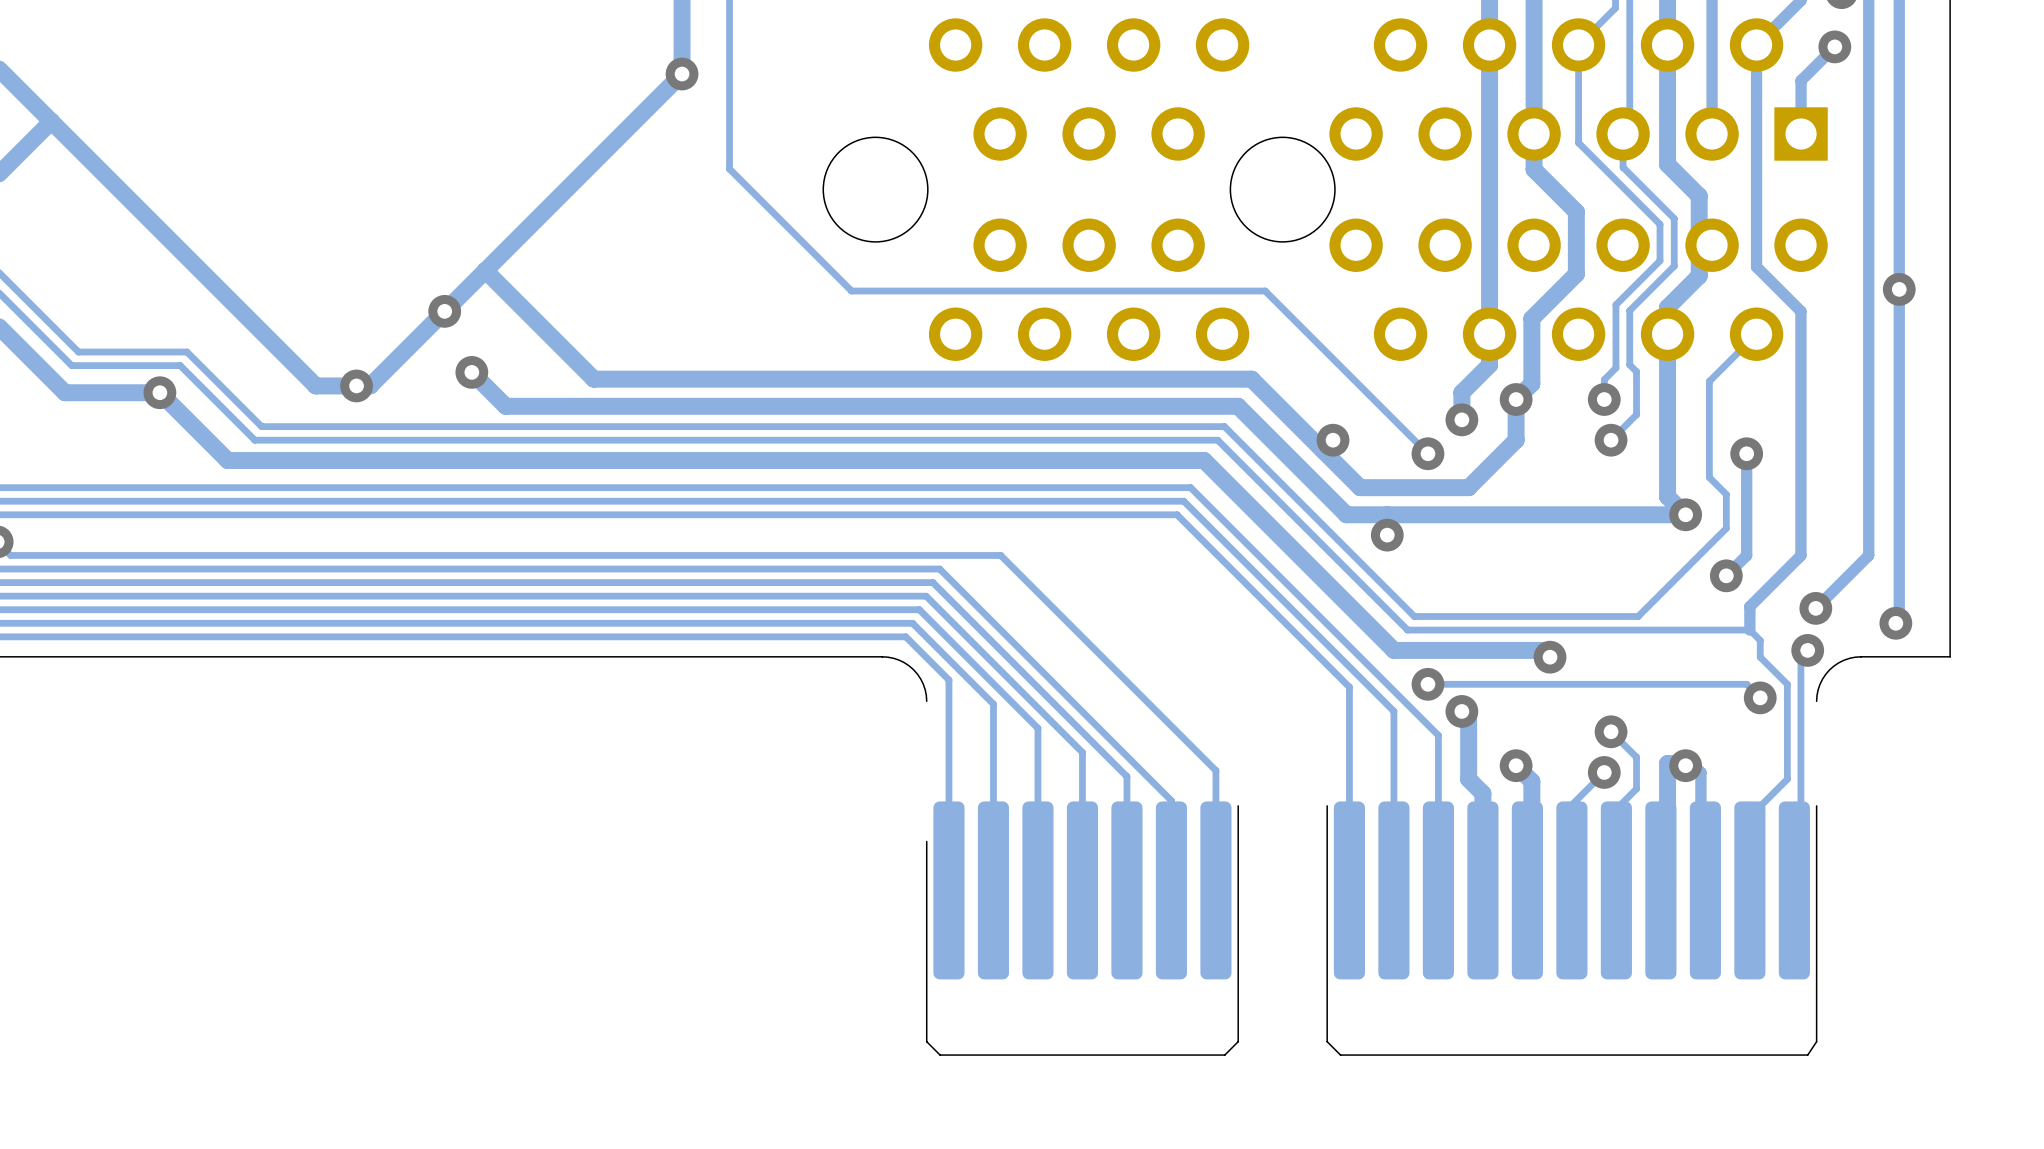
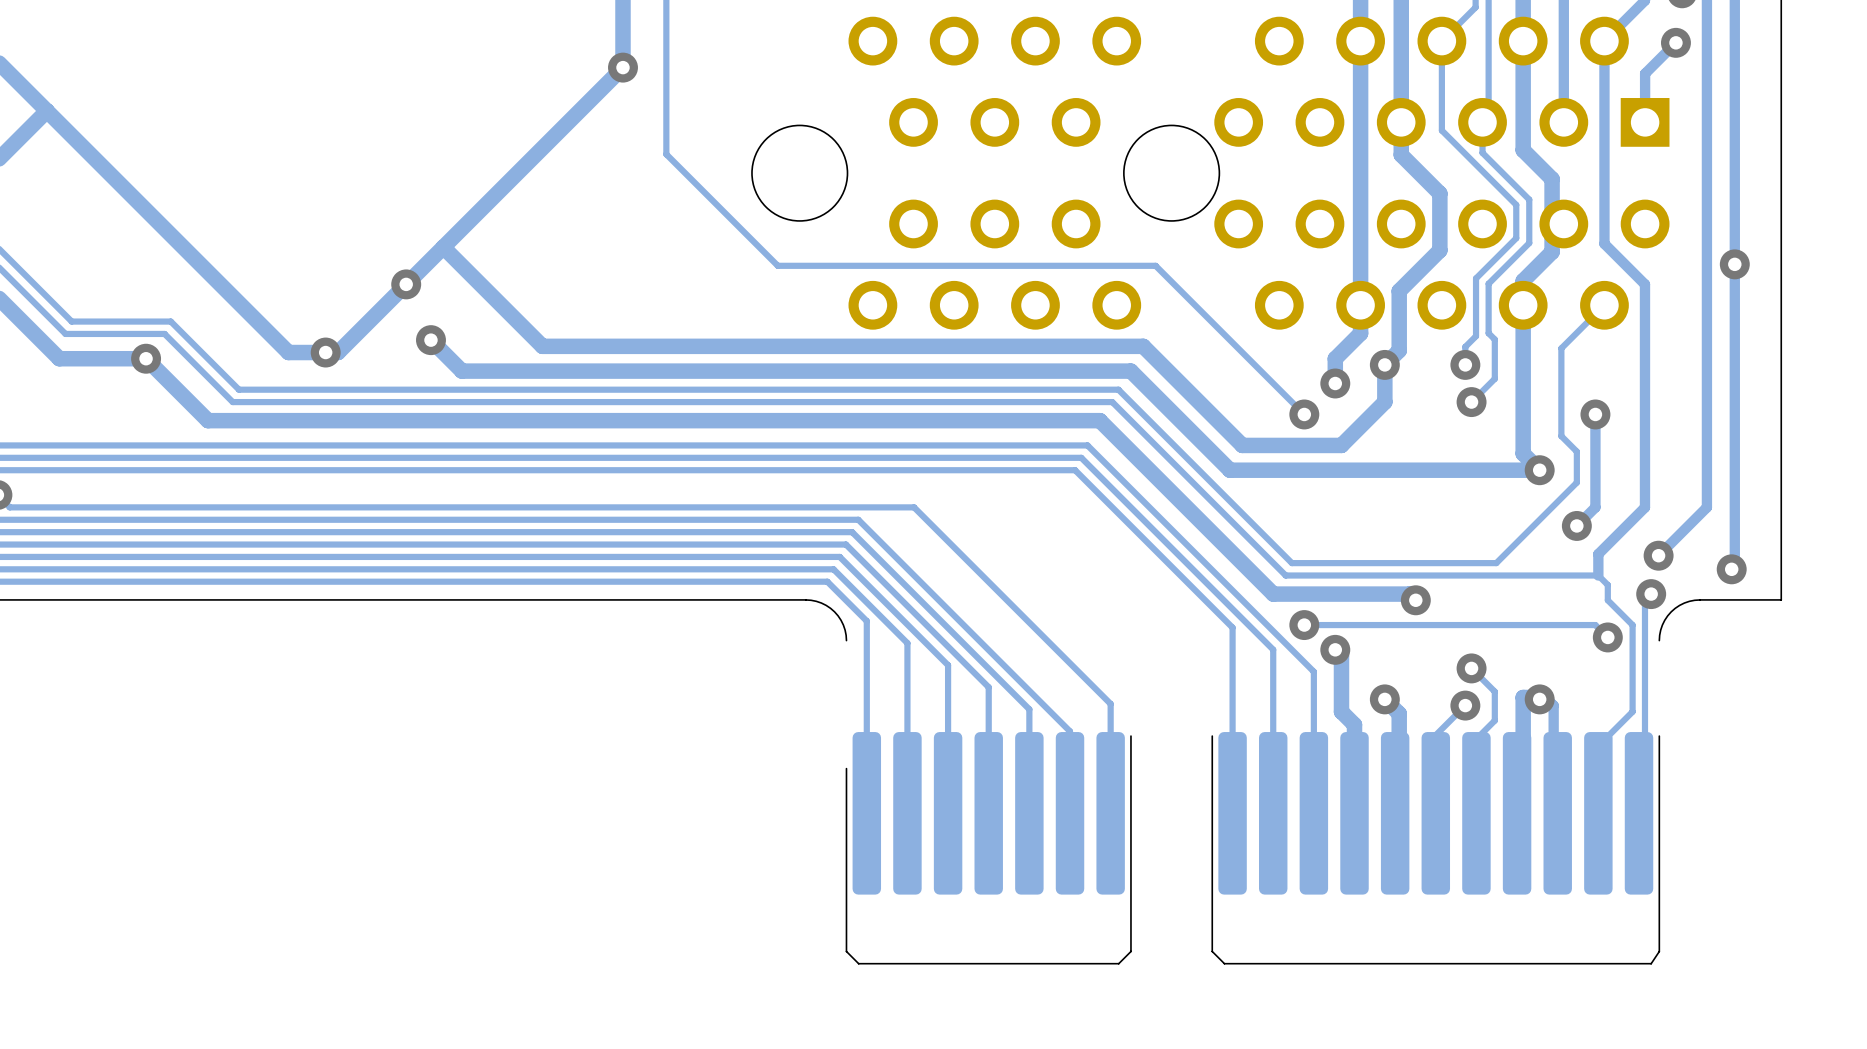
via: (1333, 440) -> none
via: (1387, 535) -> none

